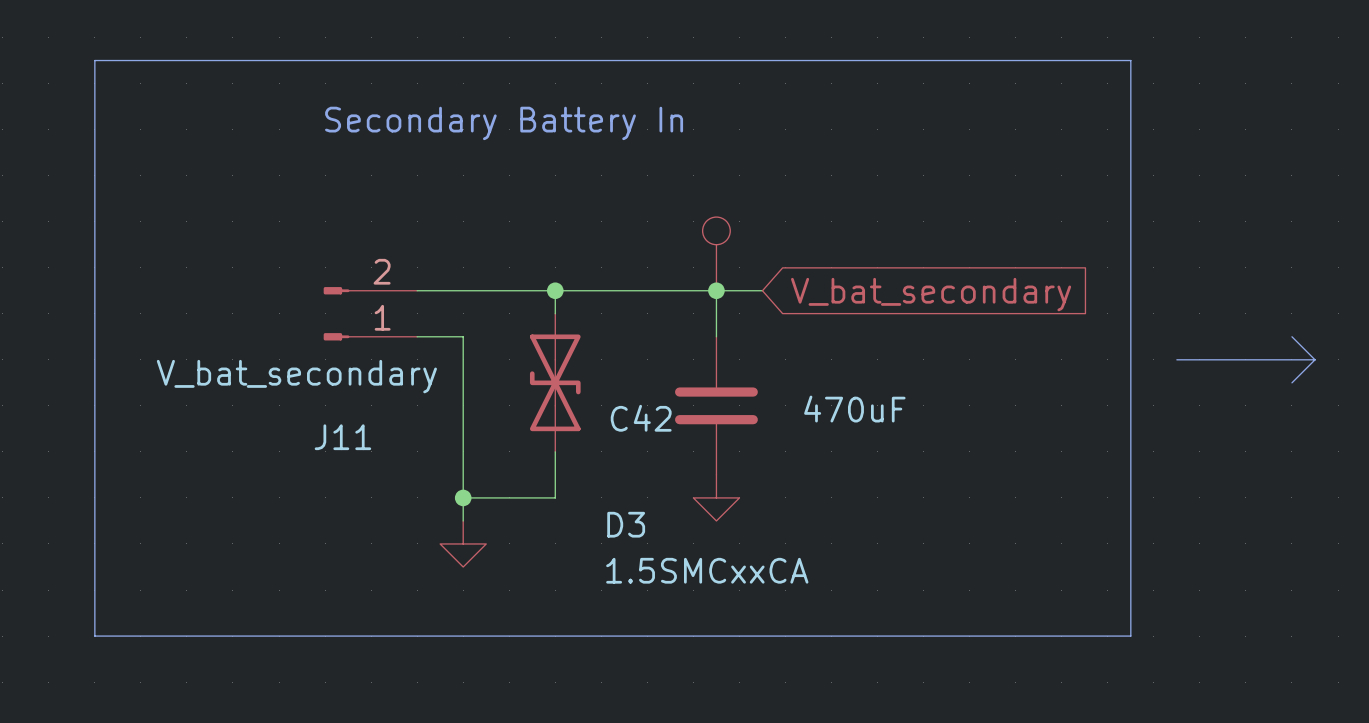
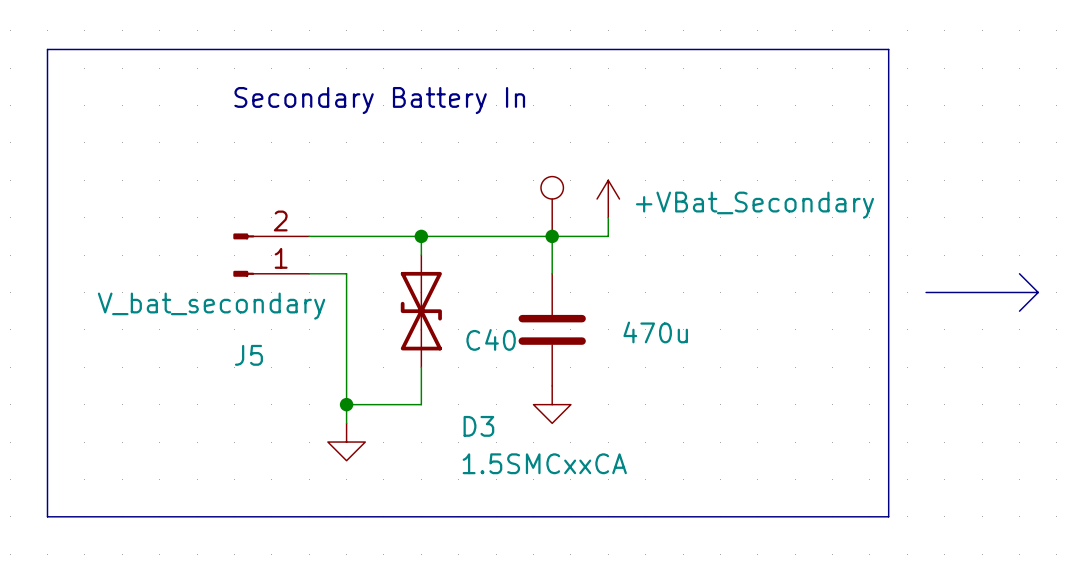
power symbol: none -> +VBat_Secondary (608, 199)
wire: none -> (608, 217) (608, 236) (589, 236)
global label: V_bat_secondary (931, 294) -> none
C42 value: 470uF (854, 409) -> 470u (655, 332)
C42 name: C42 (641, 418) -> C40 (491, 339)
J11 name: J11 (342, 437) -> J5 (248, 355)

